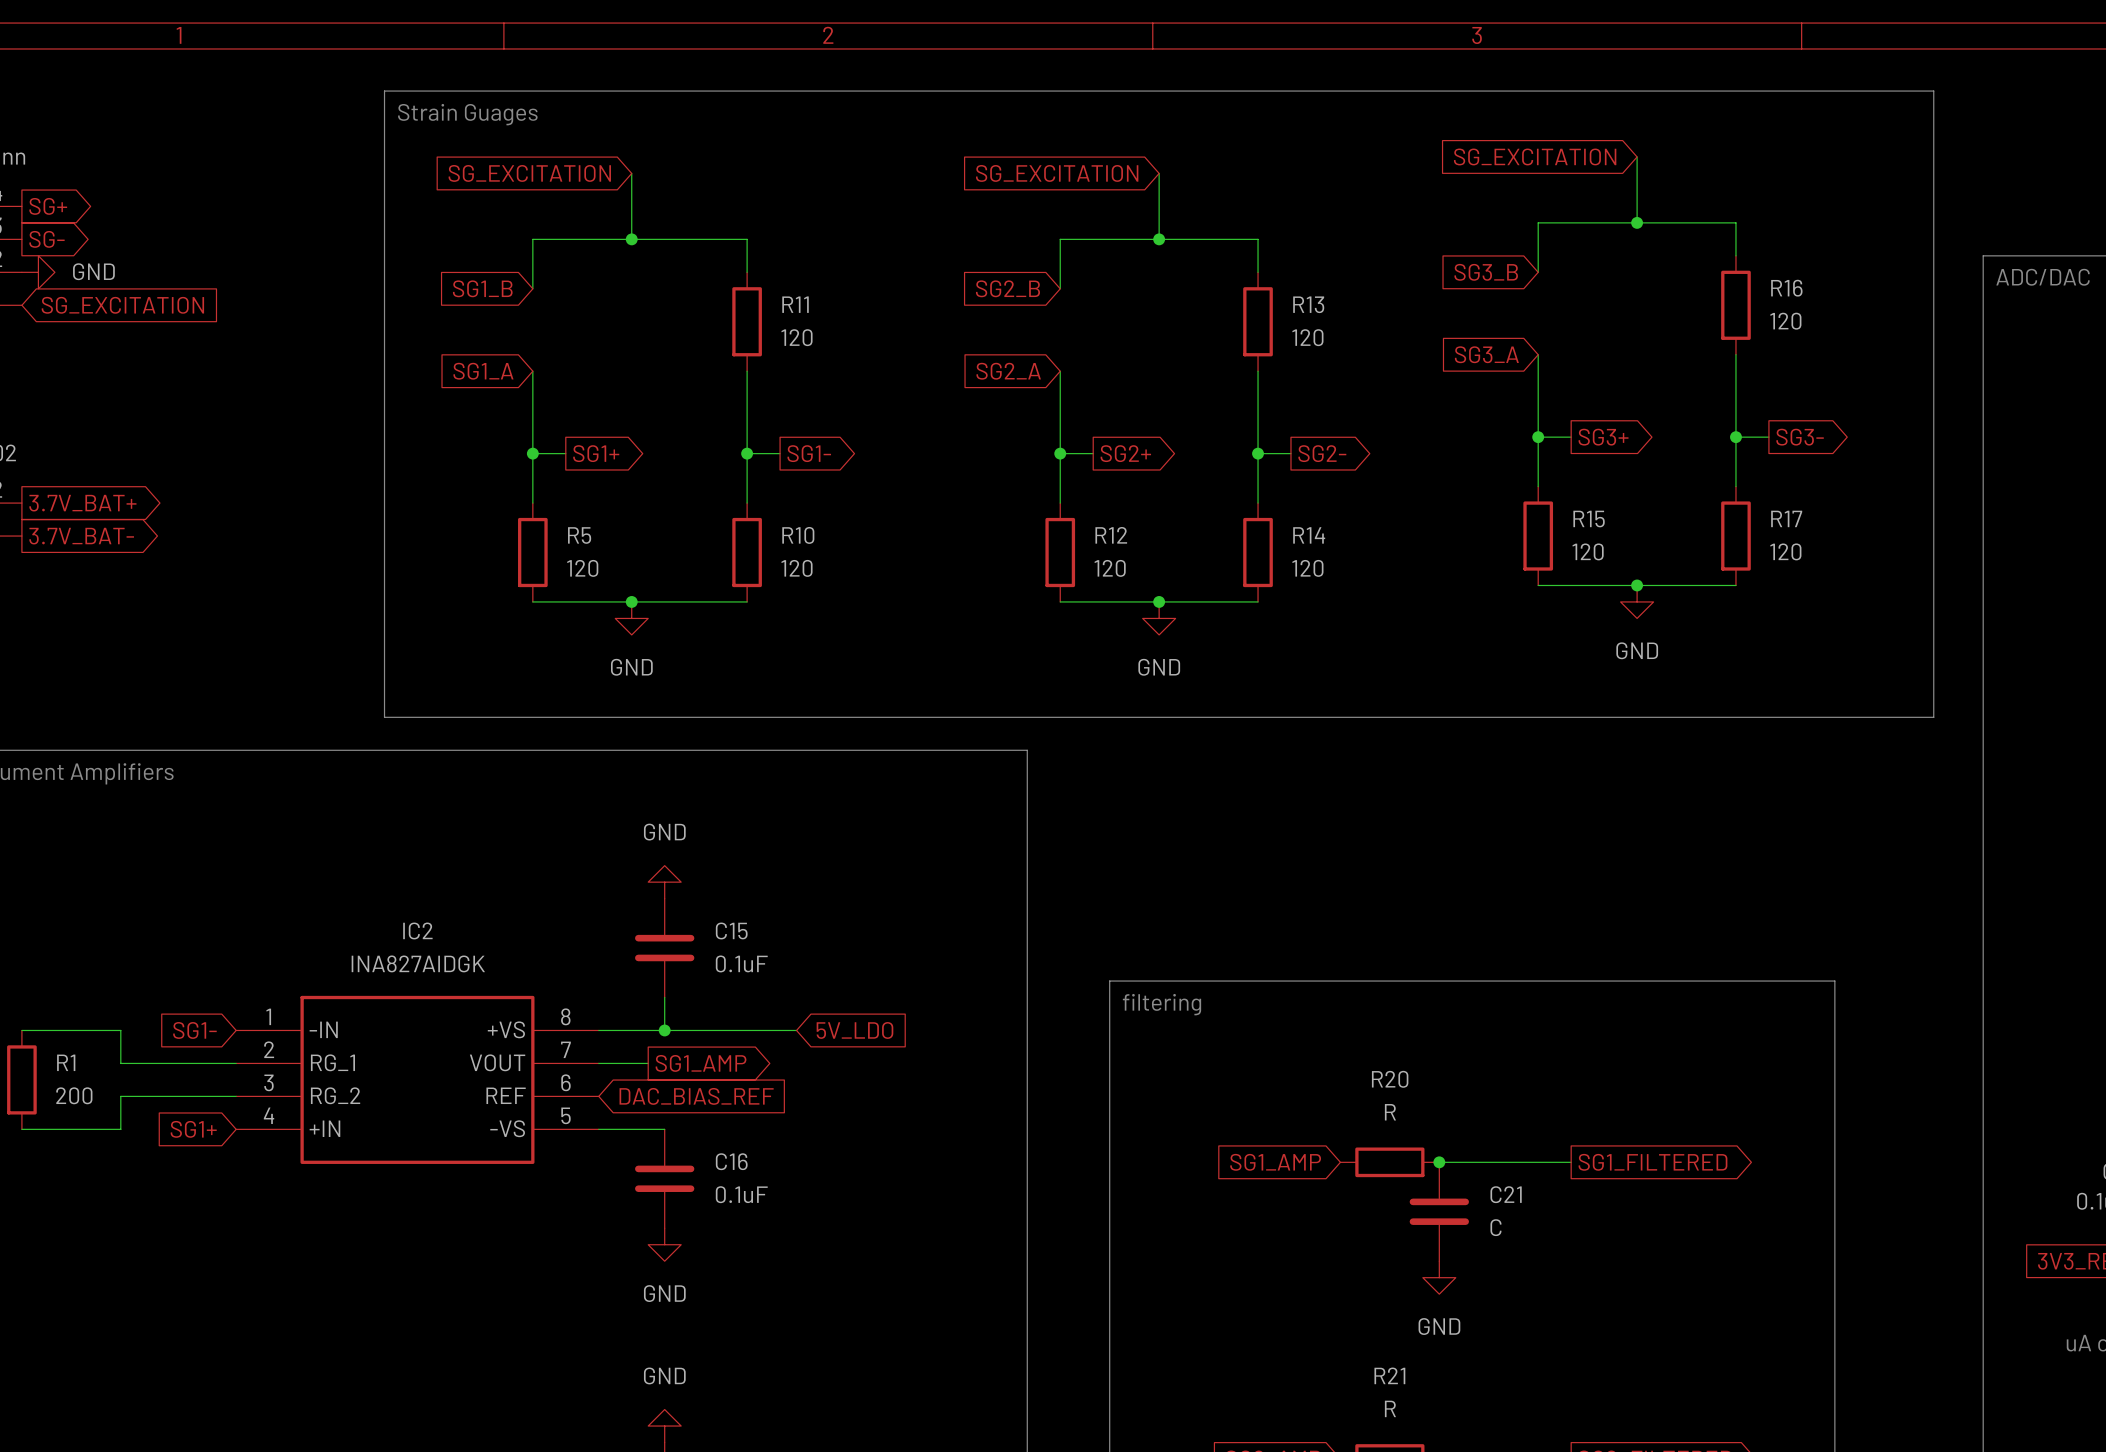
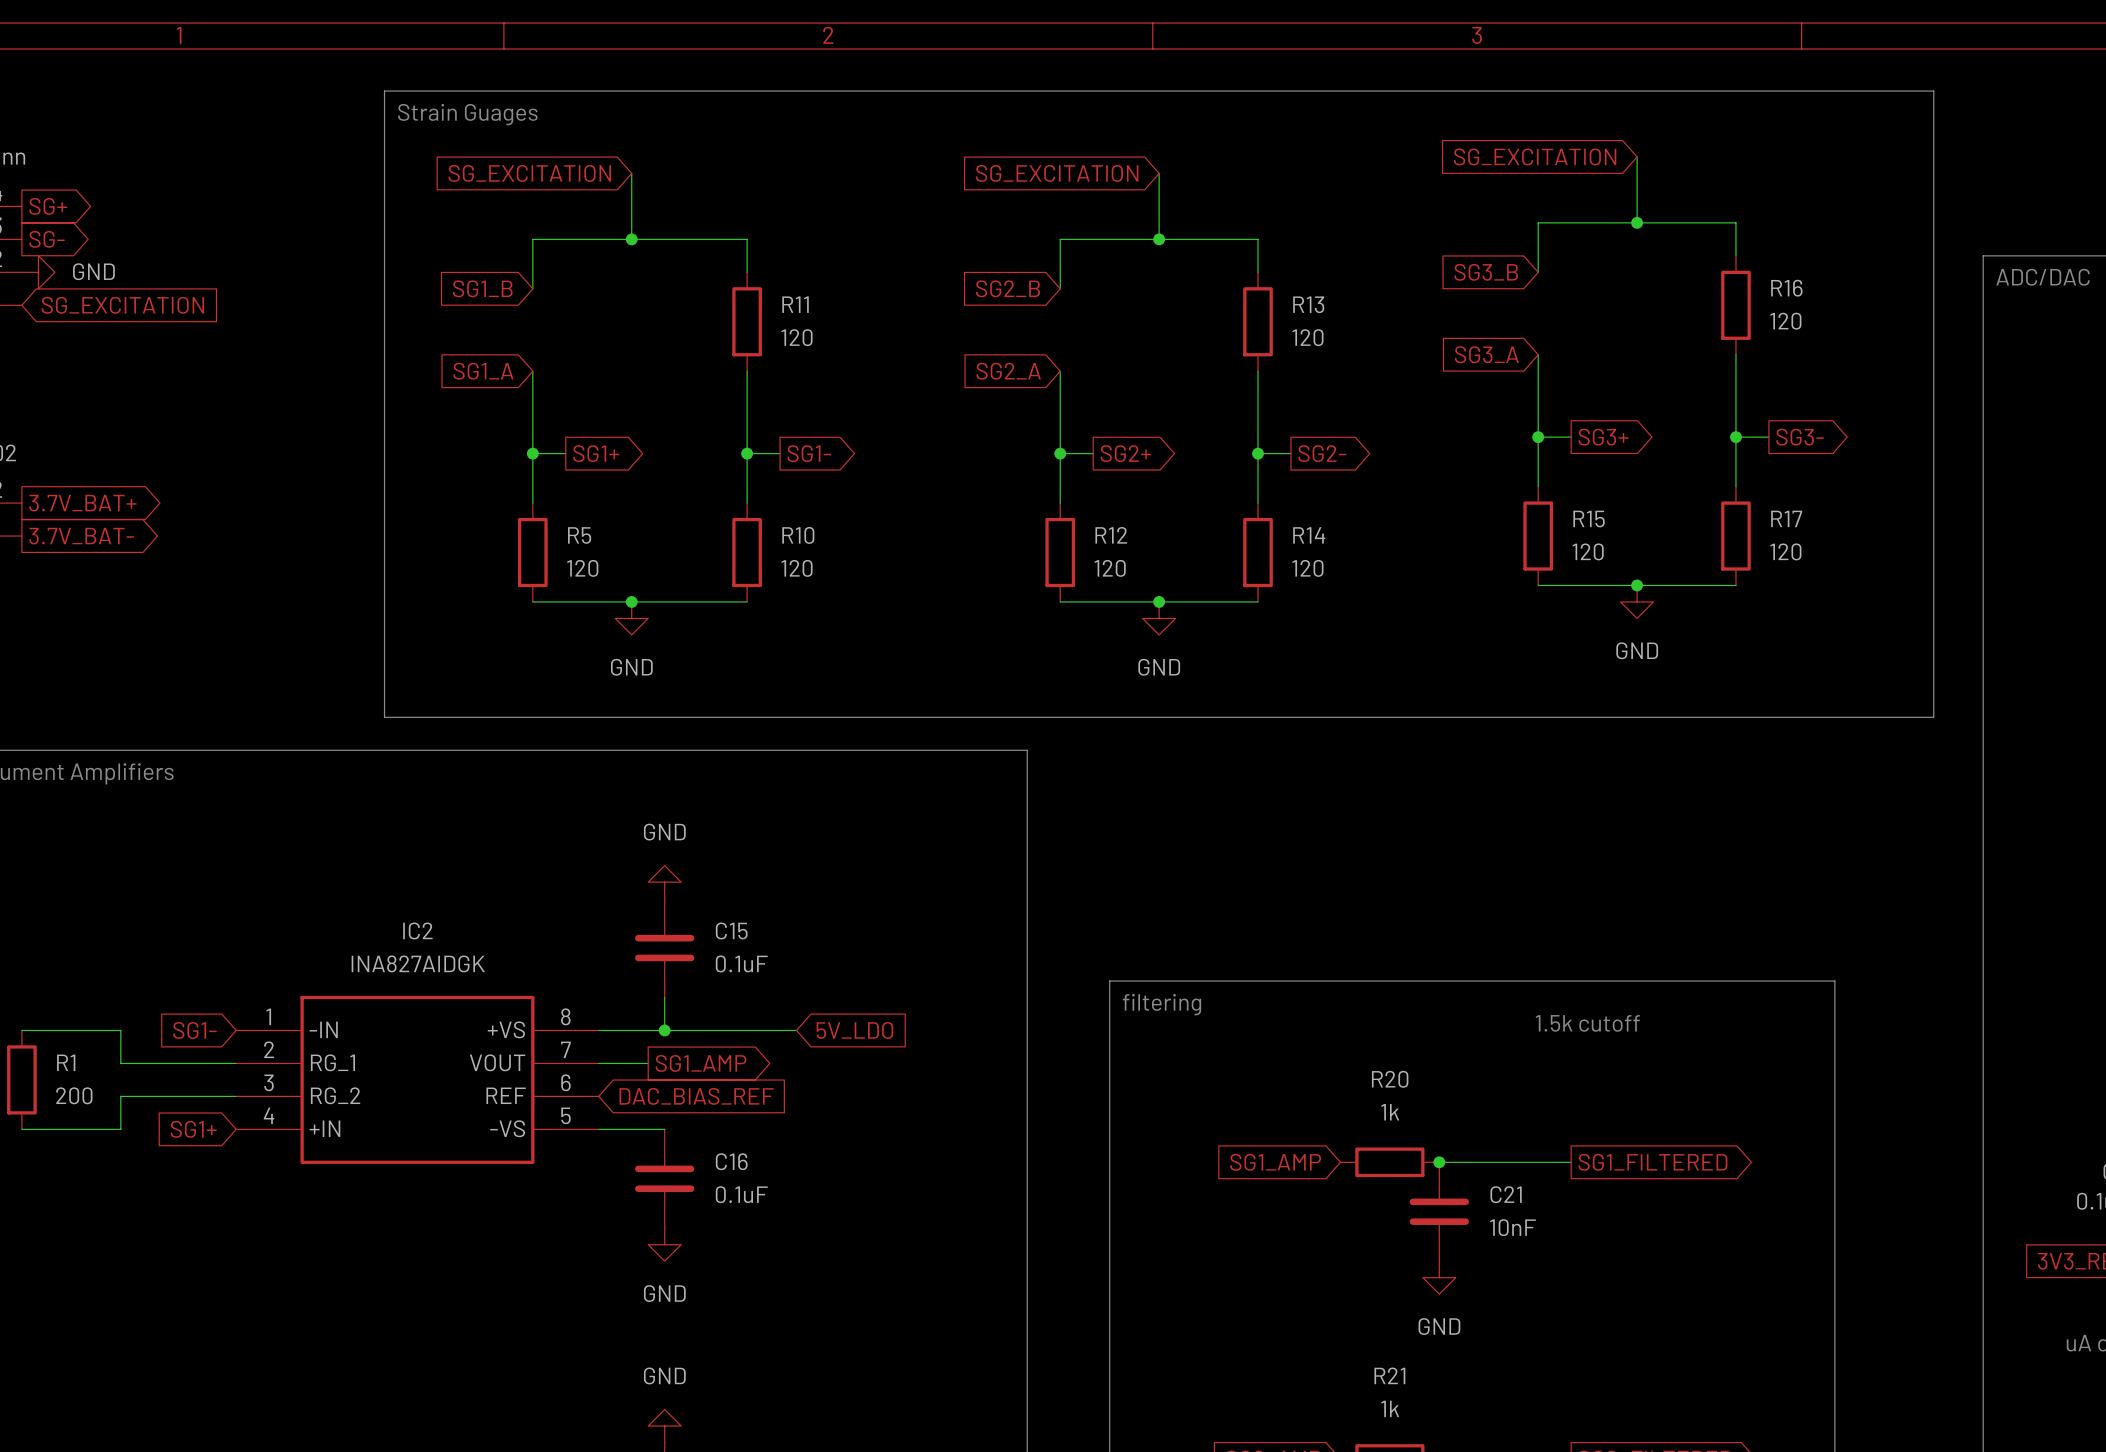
text: none -> 1.5k cutoff (1587, 1023)
R20 value: R (1390, 1112) -> 1k (1390, 1112)
C21 value: C (1495, 1227) -> 10nF (1512, 1227)
R21 value: R (1390, 1408) -> 1k (1390, 1408)

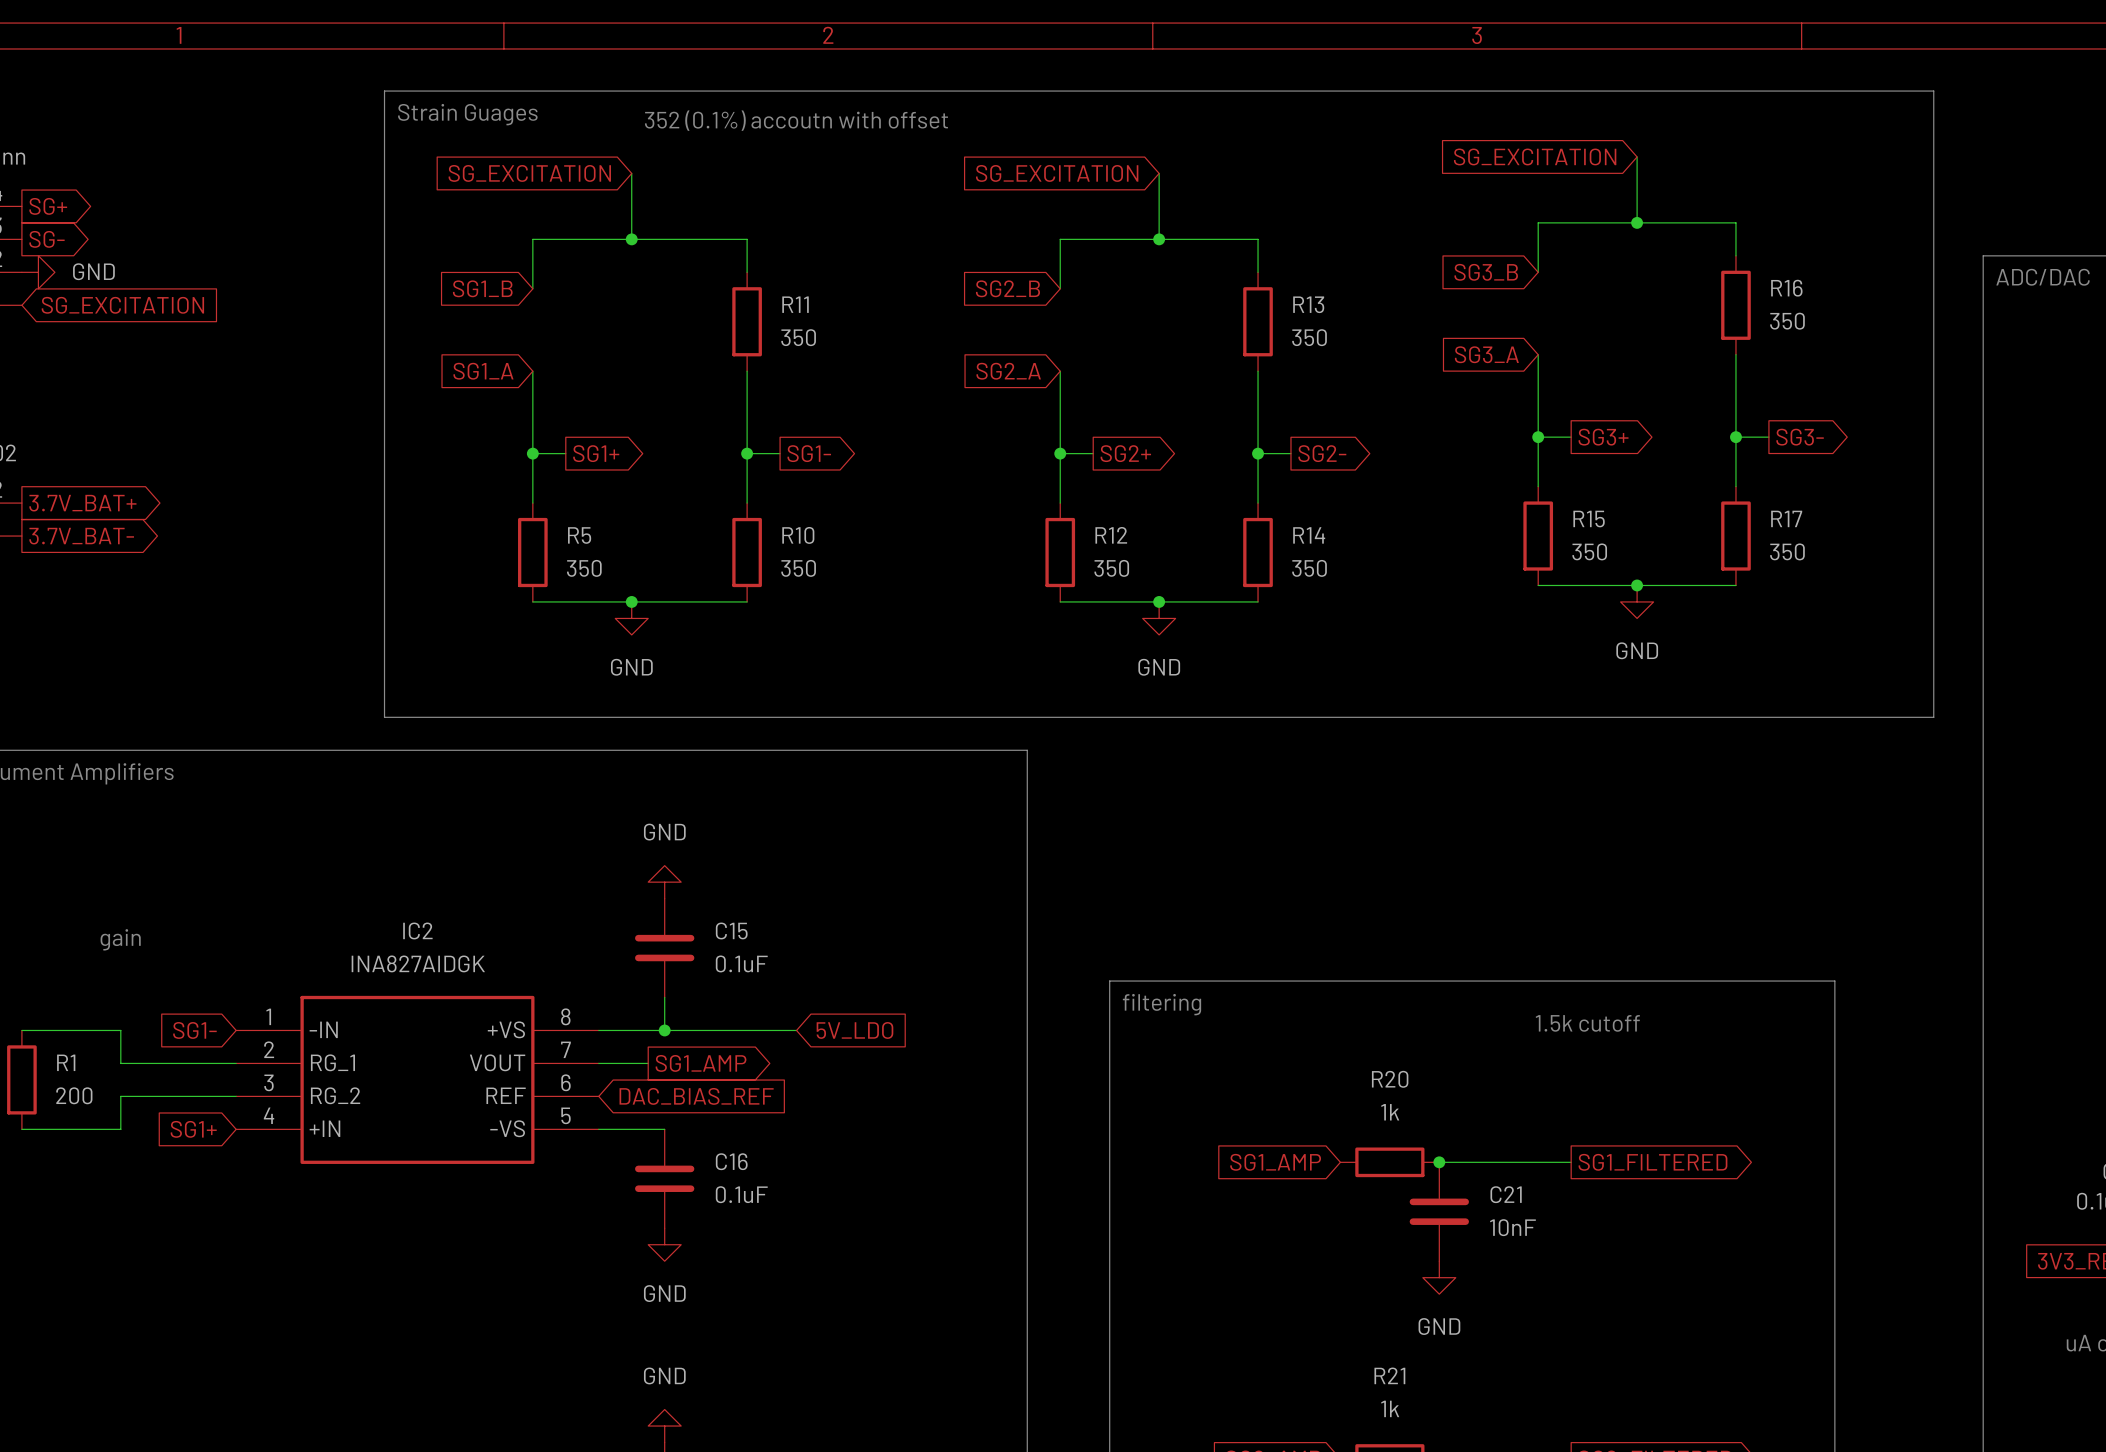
text: none -> 352 (0.1%) accoutn with offset (796, 120)
R16 value: 120 (1785, 321) -> 350 (1787, 321)
R11 value: 120 (796, 337) -> 350 (798, 337)
R13 value: 120 (1307, 337) -> 350 (1309, 337)
R15 value: 120 (1588, 551) -> 350 (1589, 551)
R17 value: 120 (1785, 551) -> 350 (1787, 551)
R5 value: 120 (582, 568) -> 350 (584, 568)
R10 value: 120 (796, 568) -> 350 (798, 568)
R12 value: 120 (1110, 568) -> 350 (1111, 568)
R14 value: 120 (1307, 568) -> 350 (1309, 568)
text: none -> gain (120, 939)

